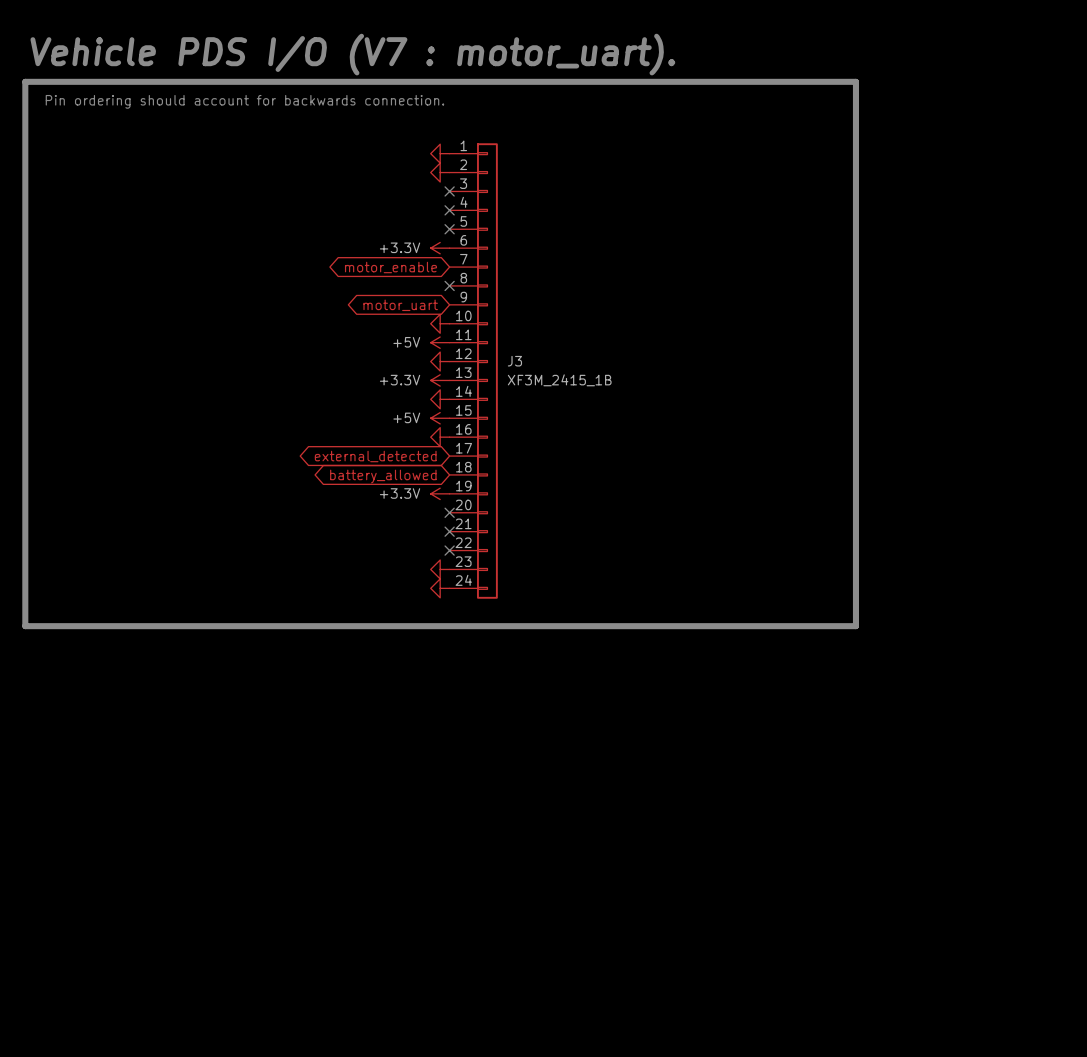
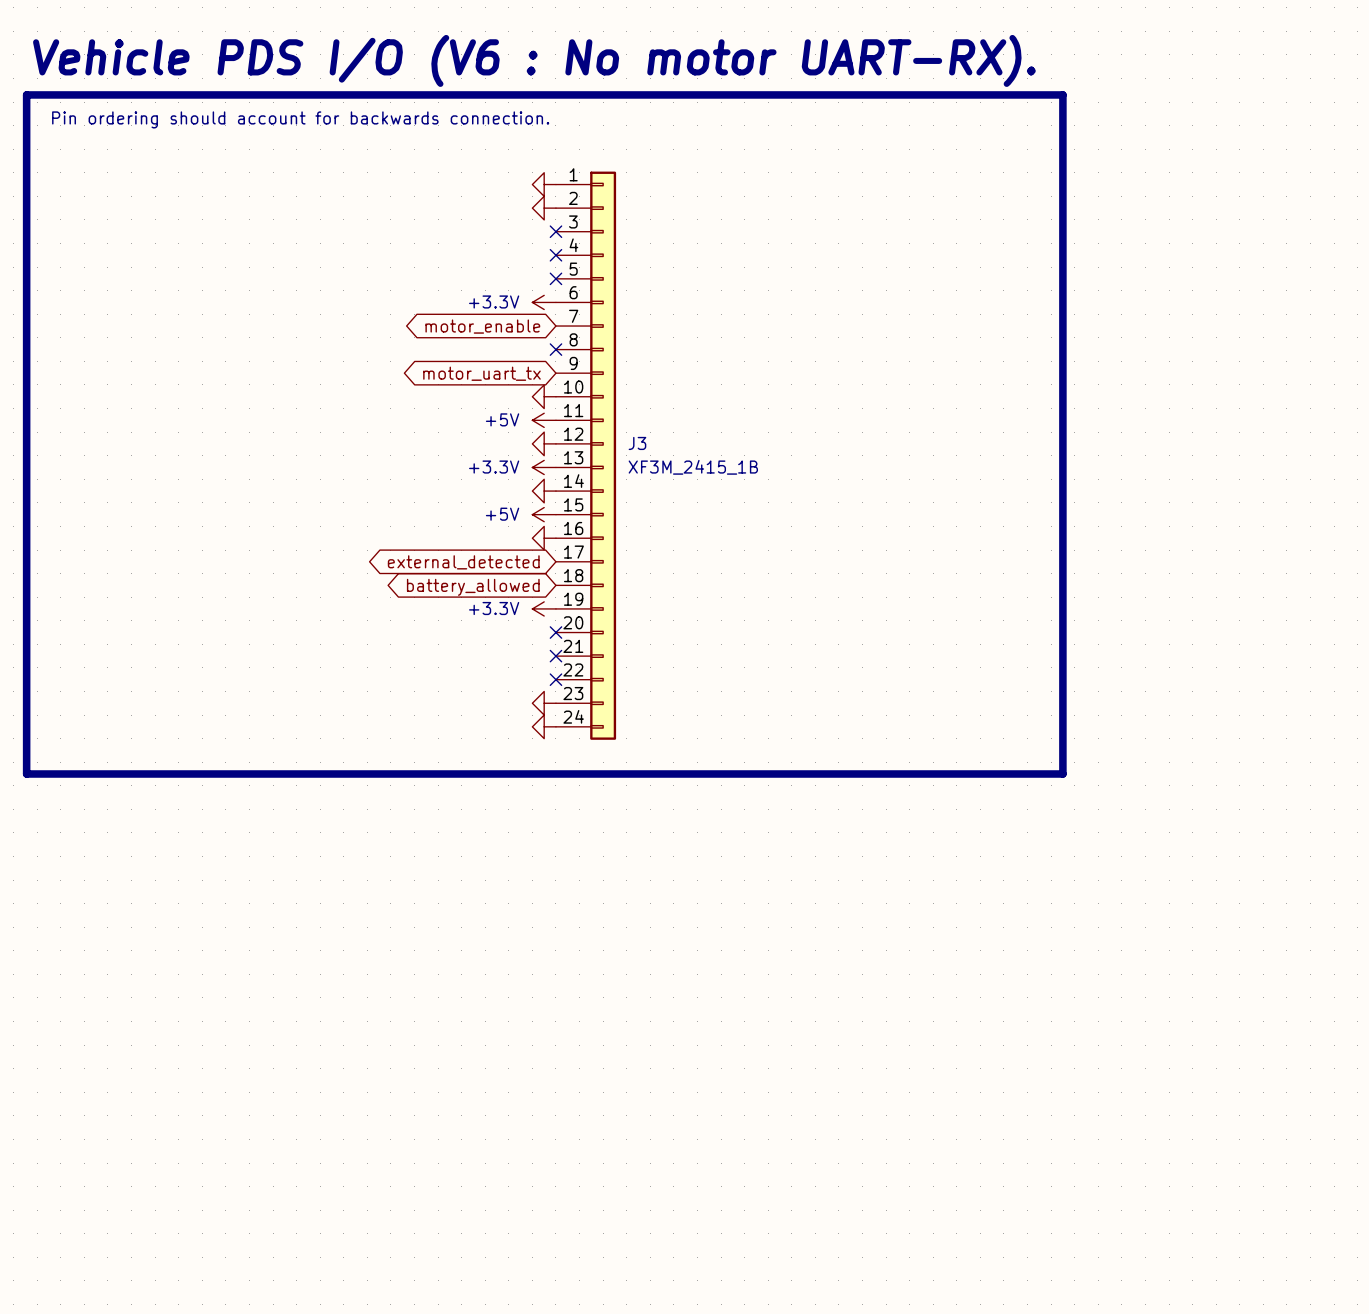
text: Vehicle PDS I/O (V7 : motor_uart). (352, 54) -> Vehicle PDS I/O (V6 : No motor UART-RX). (534, 60)
global label: motor_uart (400, 305) -> motor_uart_tx (481, 373)

